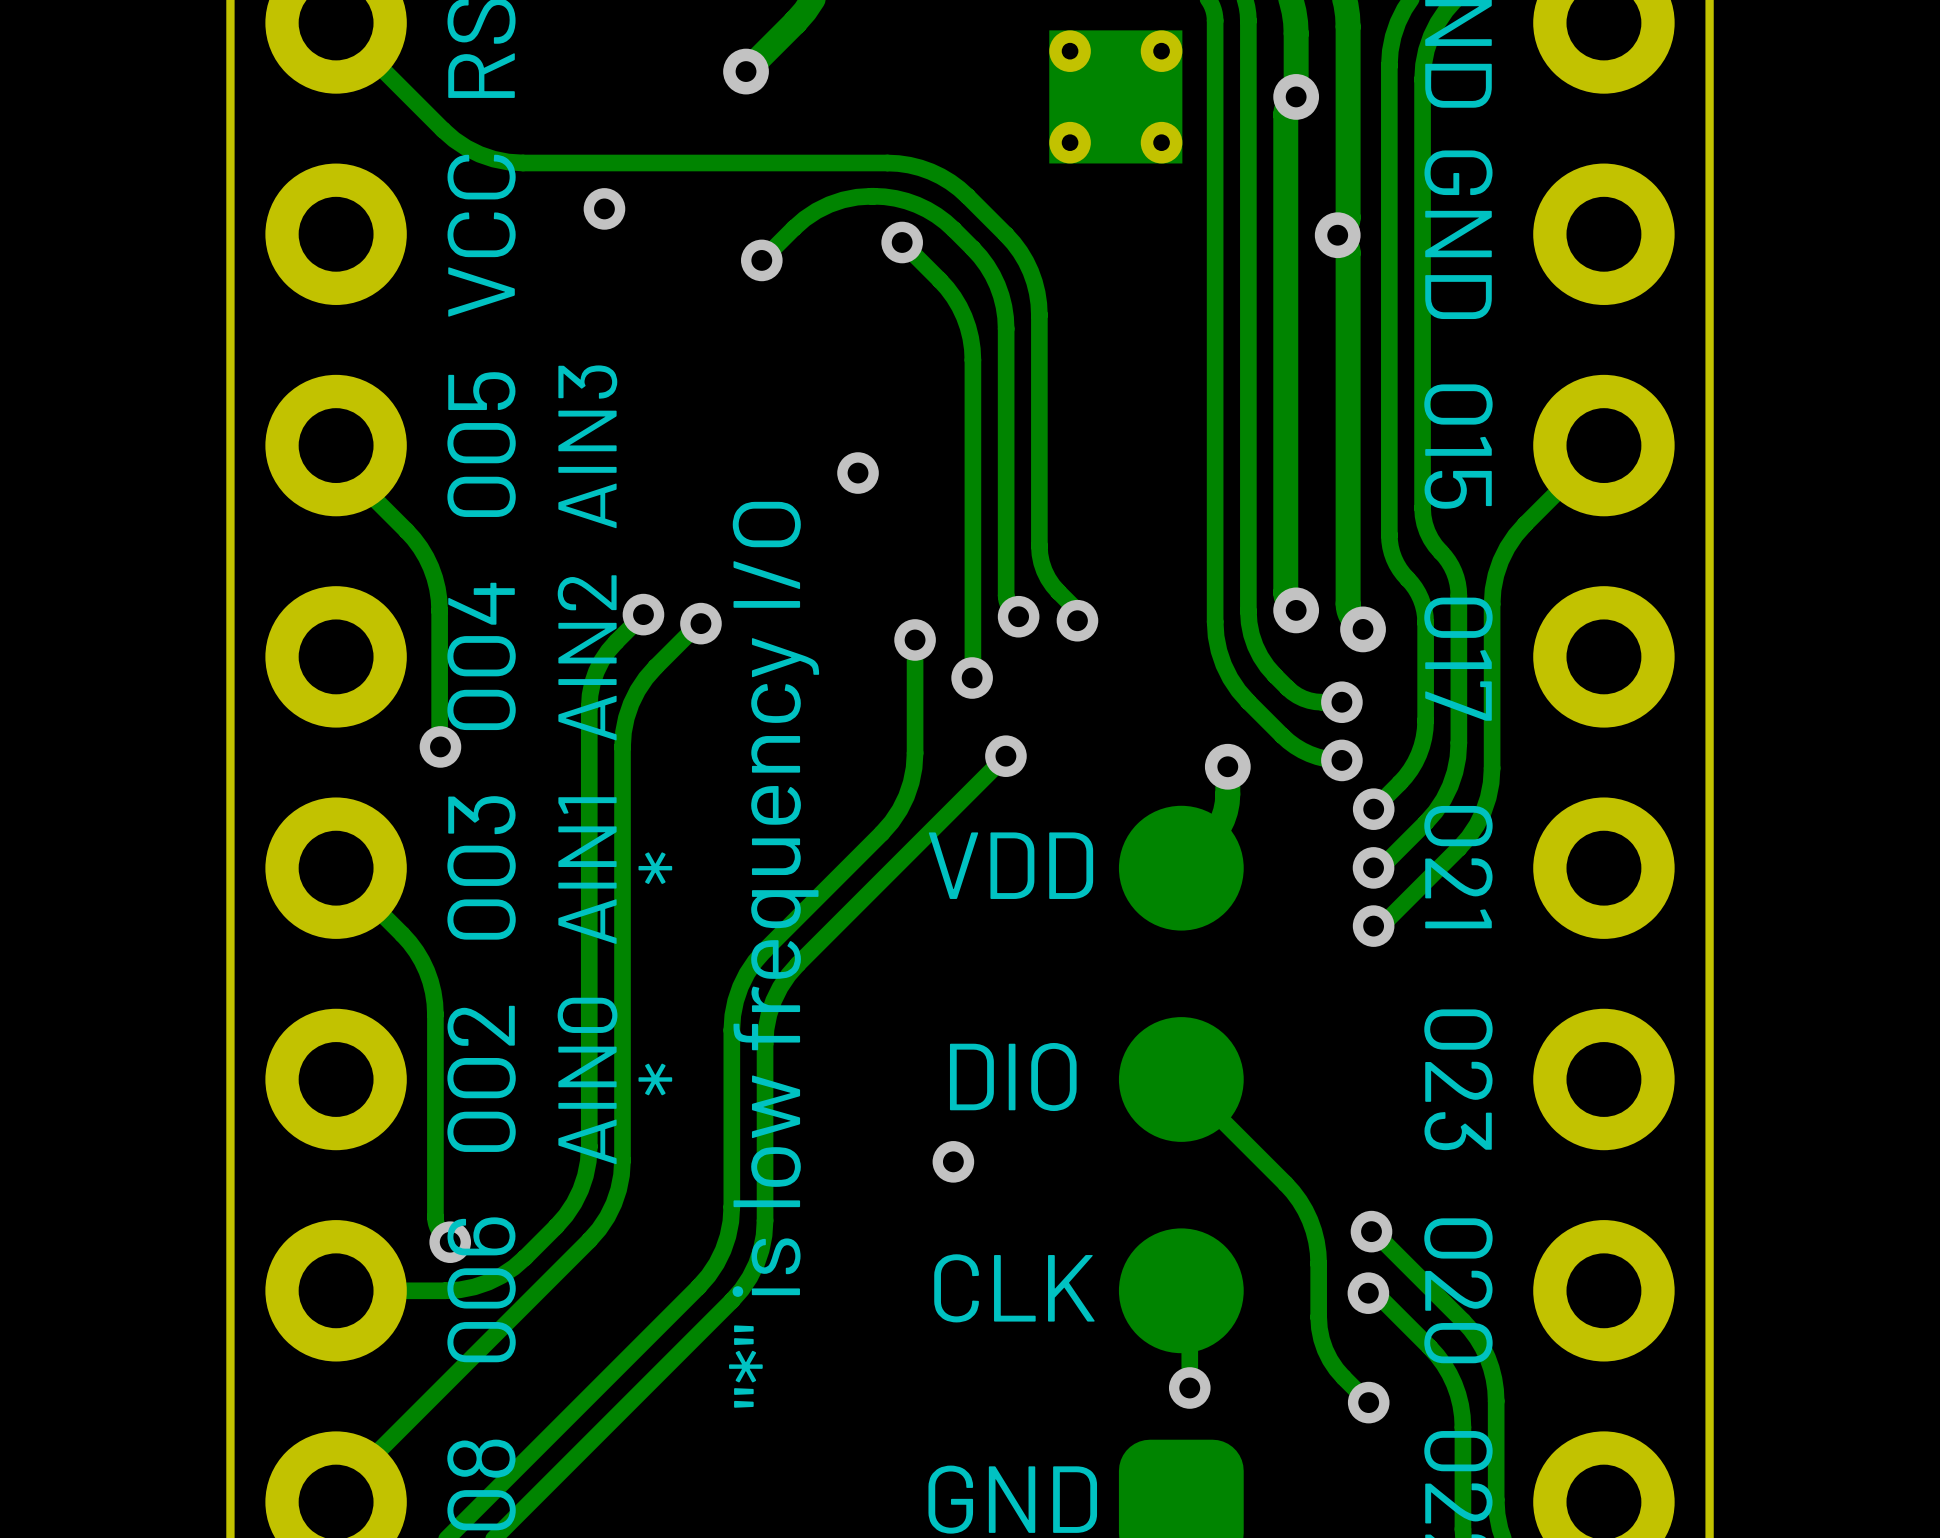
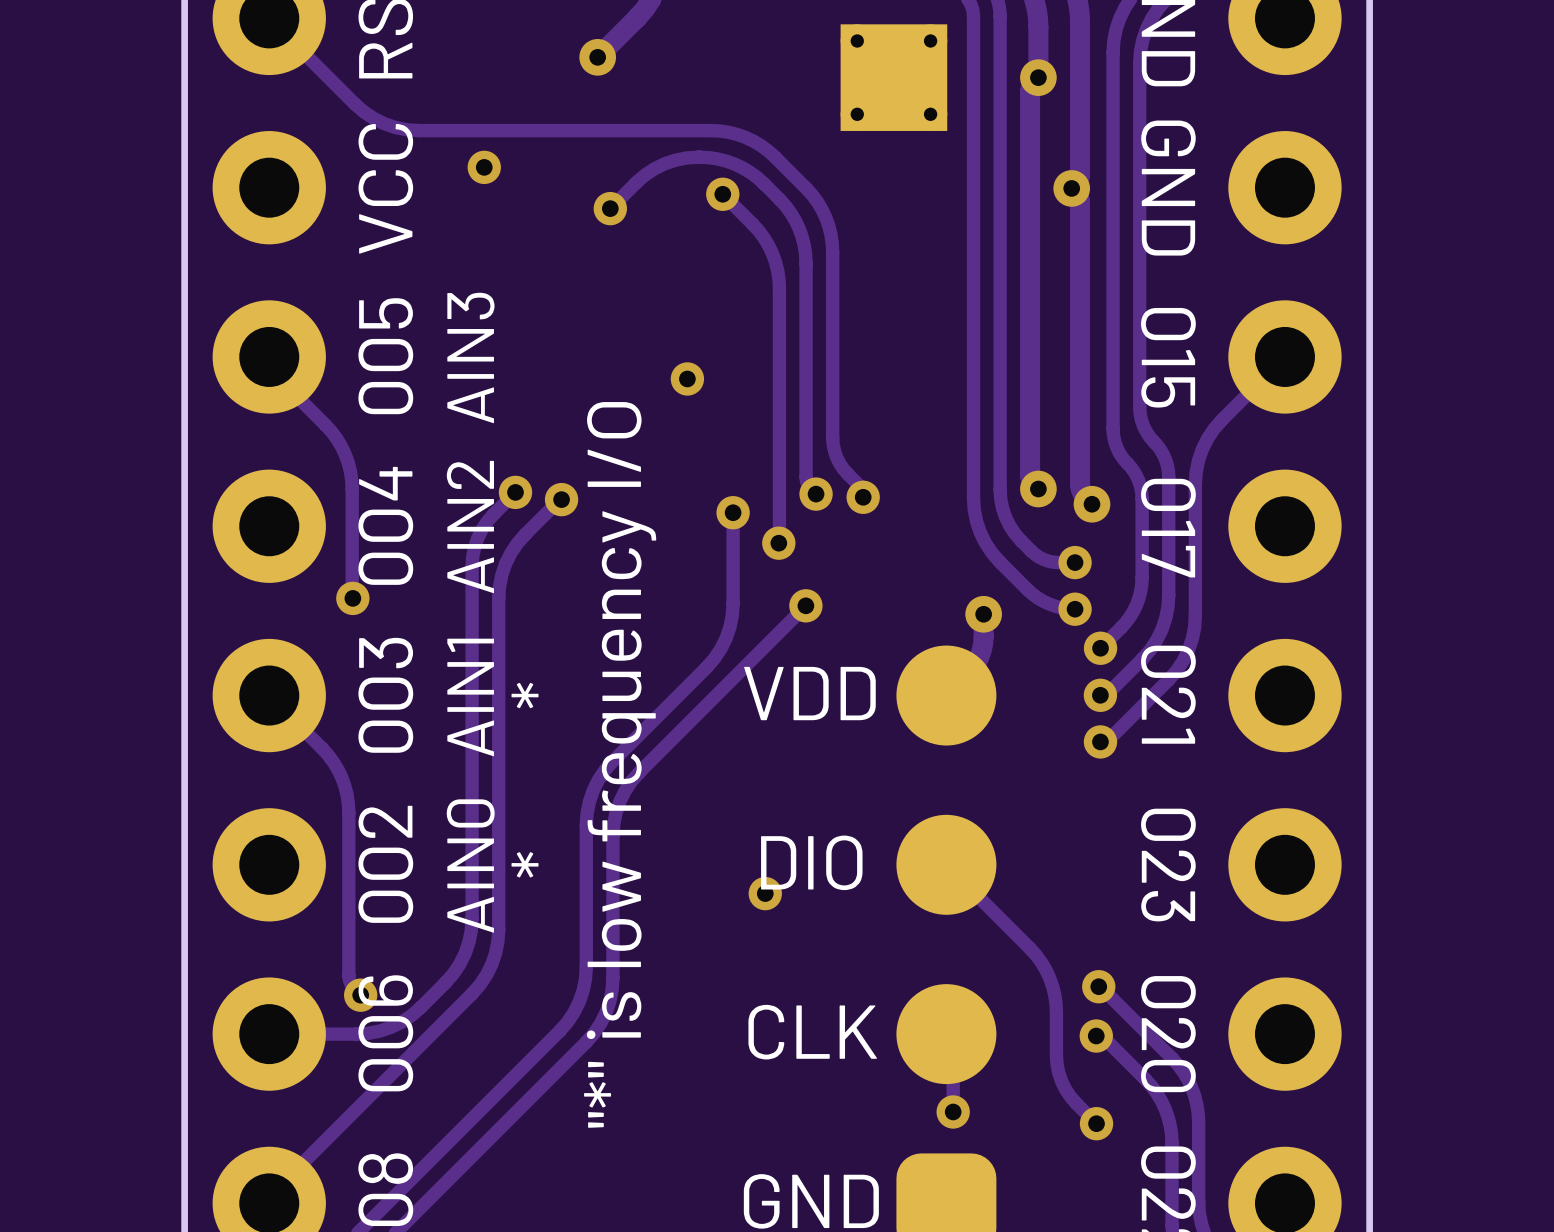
via position: (953, 1161) -> (765, 893)

